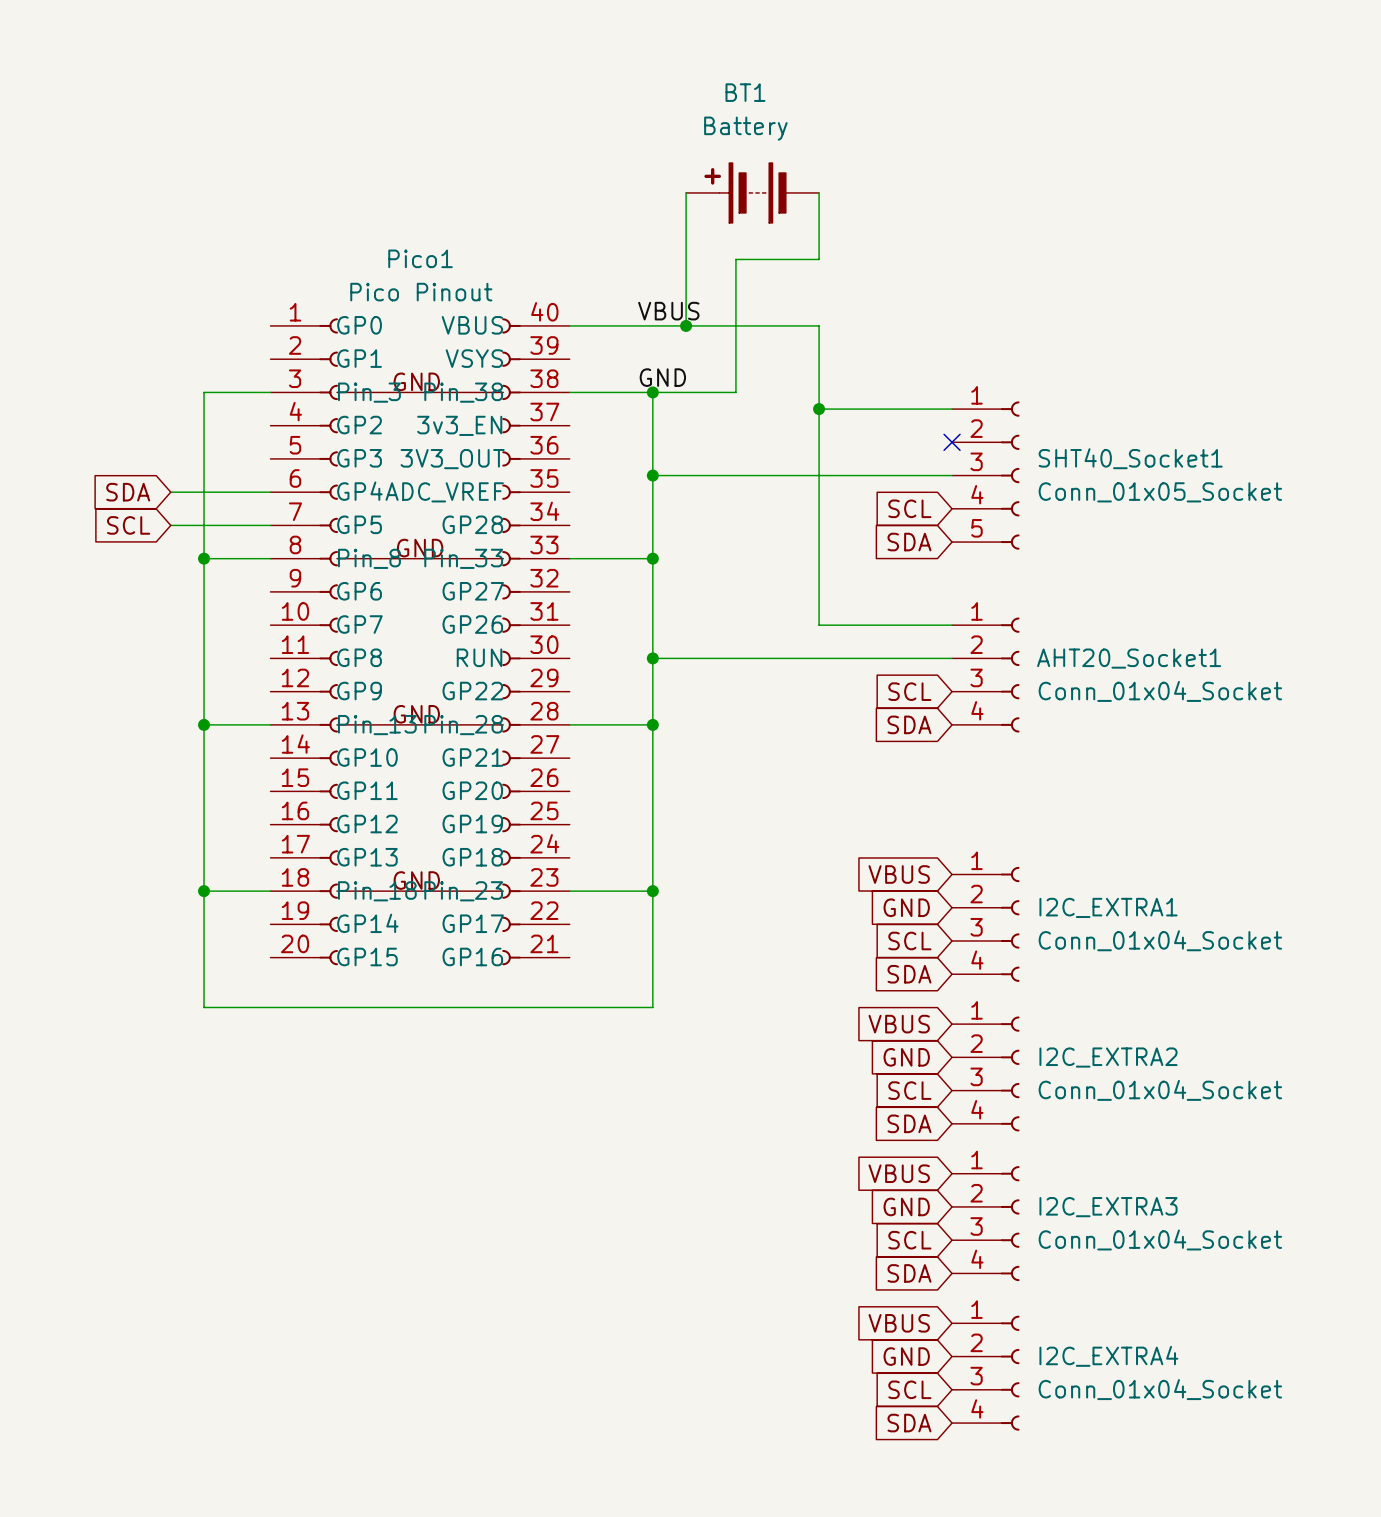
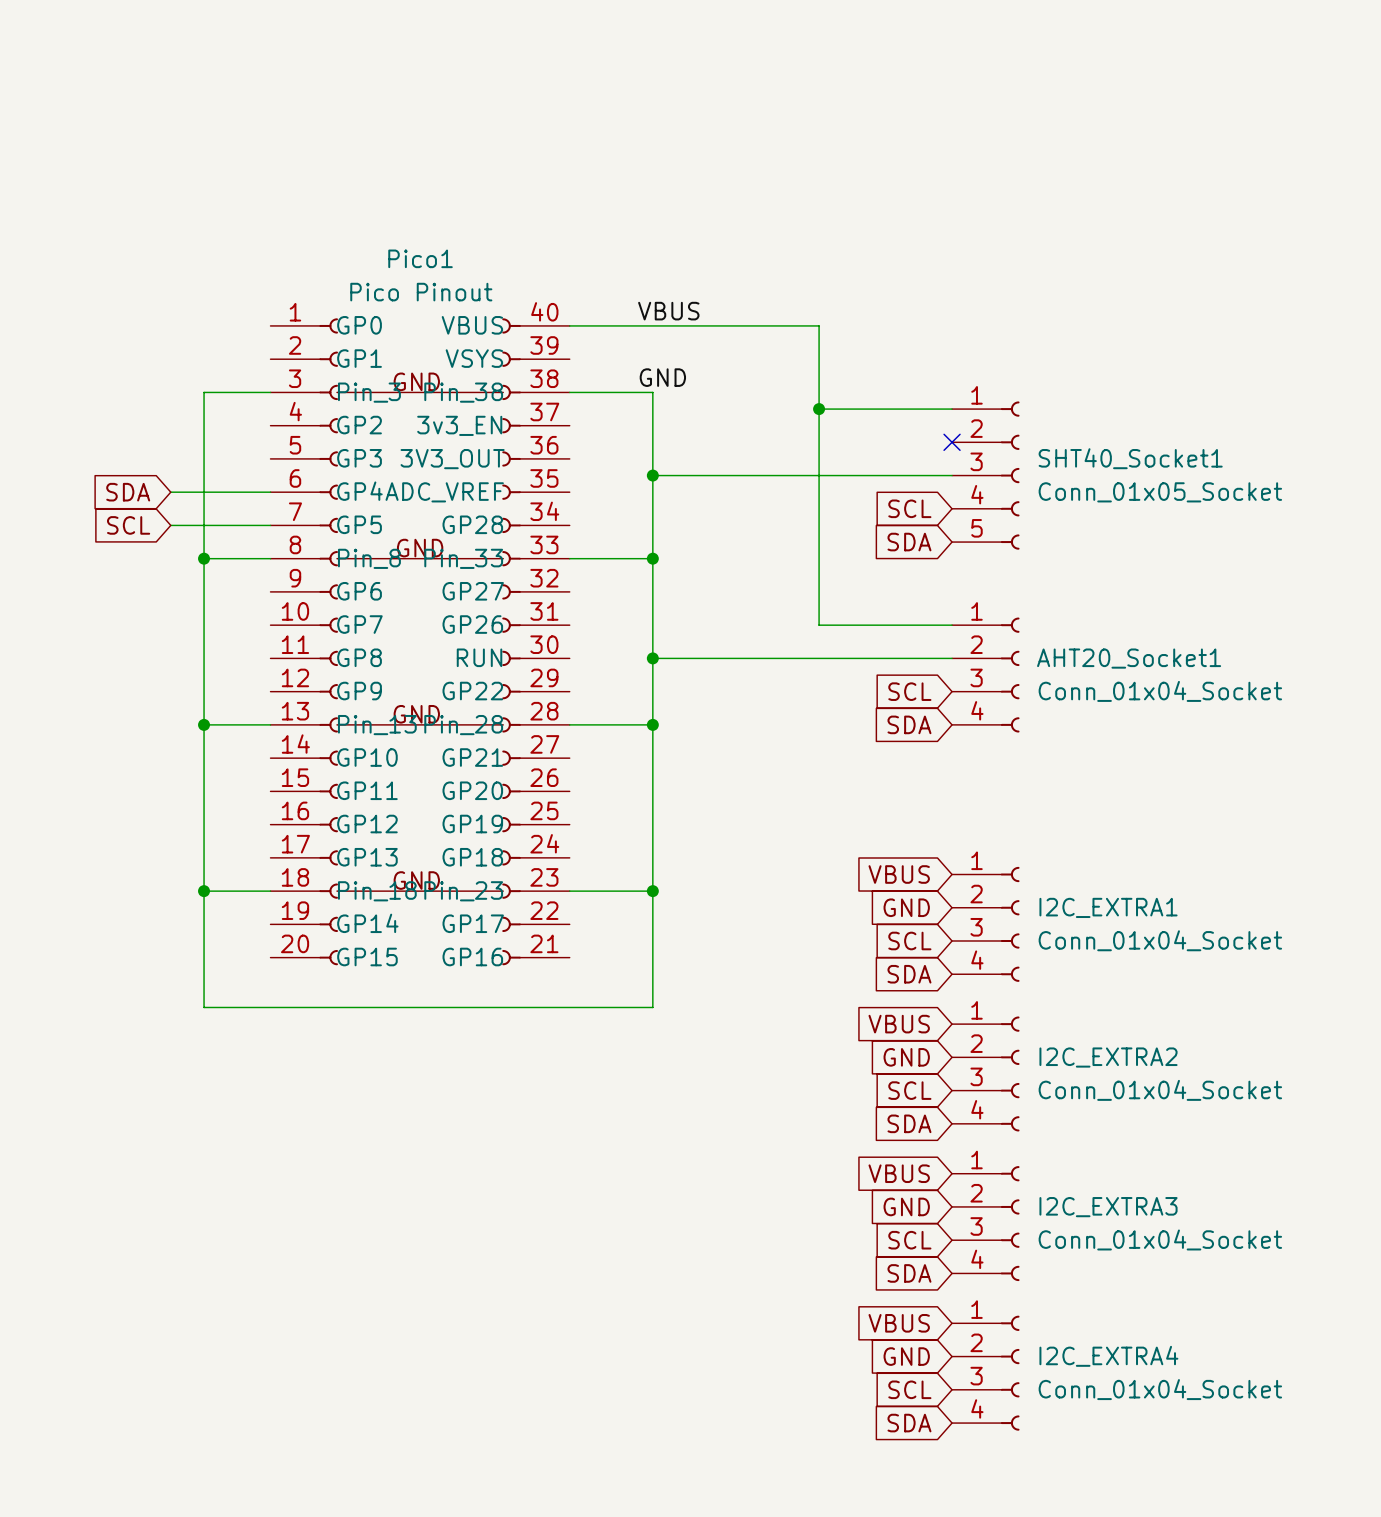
wire: (686, 192) (686, 325) -> none
BT1: Battery (752, 192) -> none
wire: (819, 192) (819, 259) (735, 259) (735, 392) (652, 392) -> none
junction: (686, 325) -> none
junction: (652, 392) -> none

